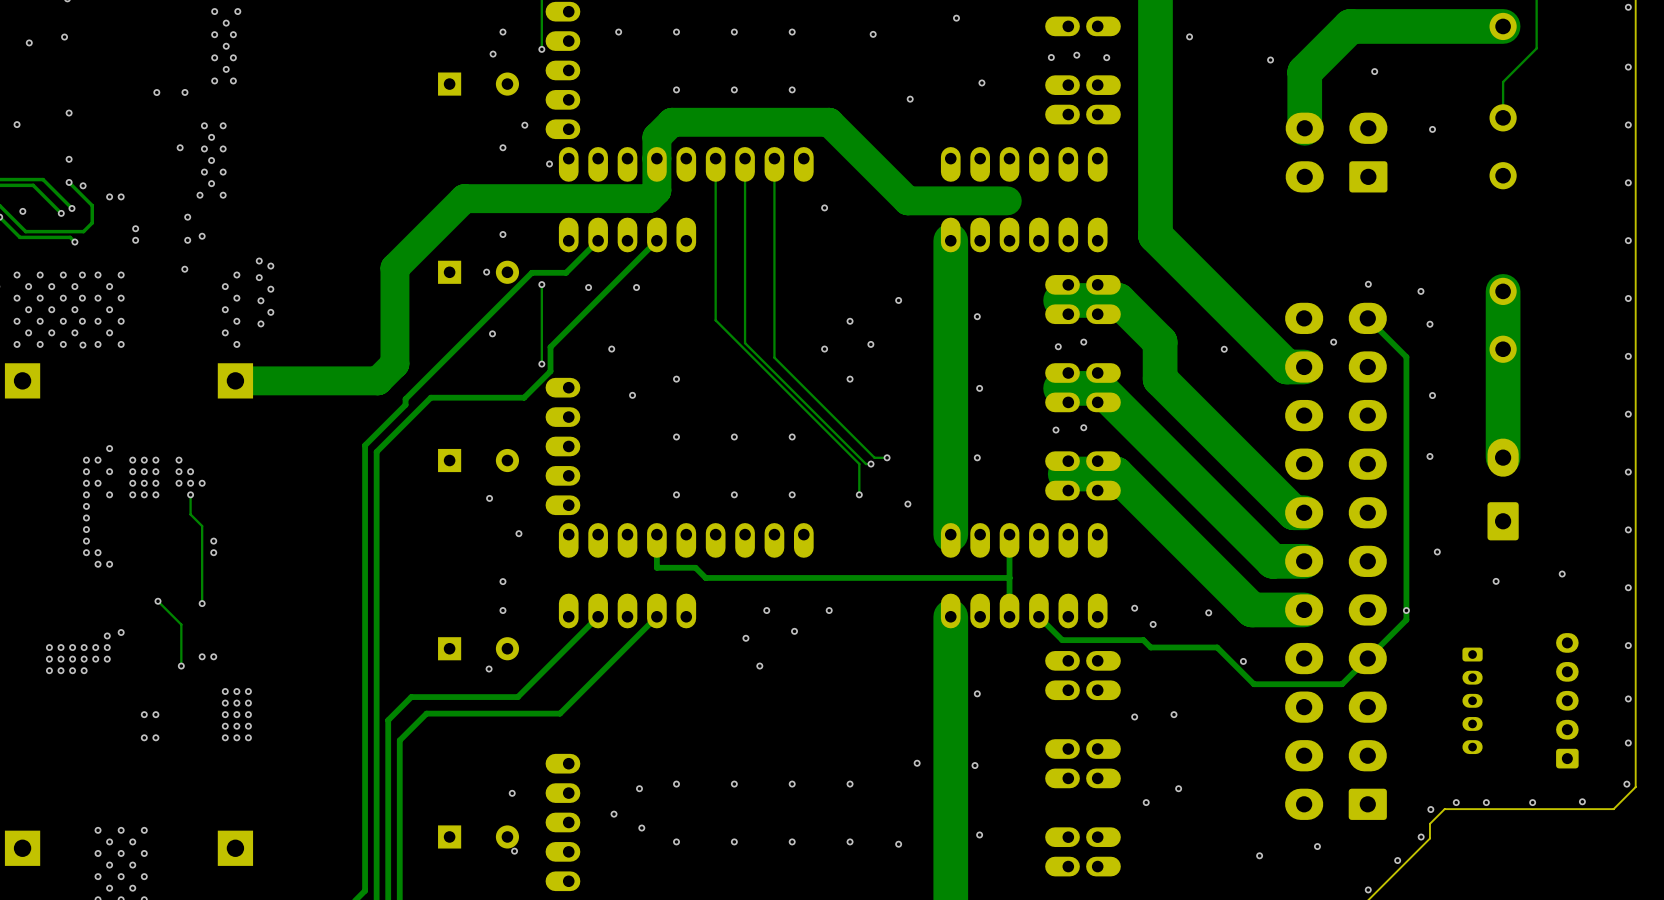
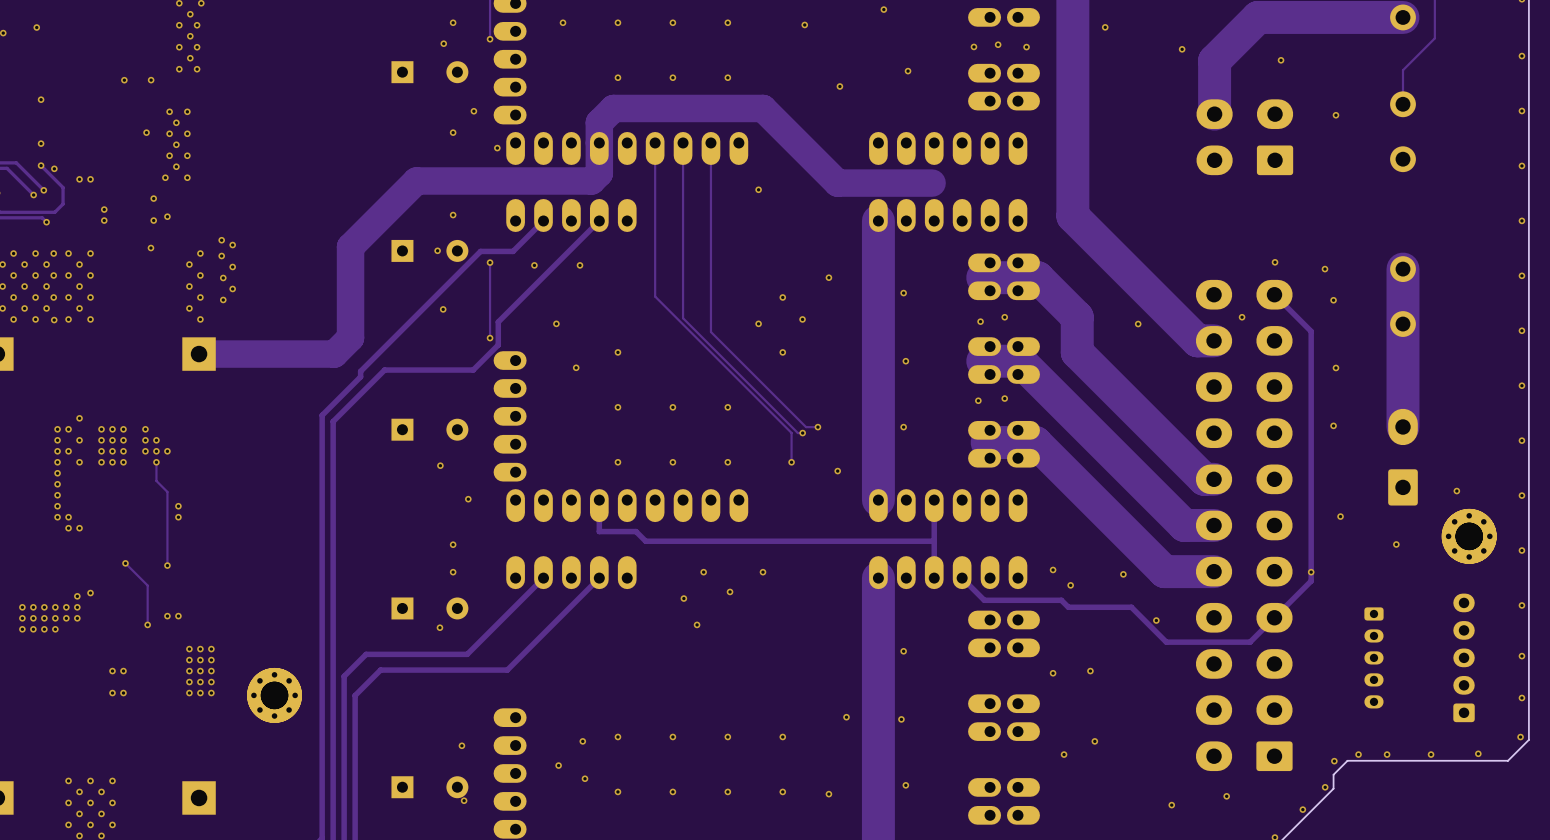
part: none -> (1469, 536)
part: none -> (1469, 536)
via position: (1562, 574) -> (1456, 491)
part: none -> (274, 695)
part: none -> (274, 695)

